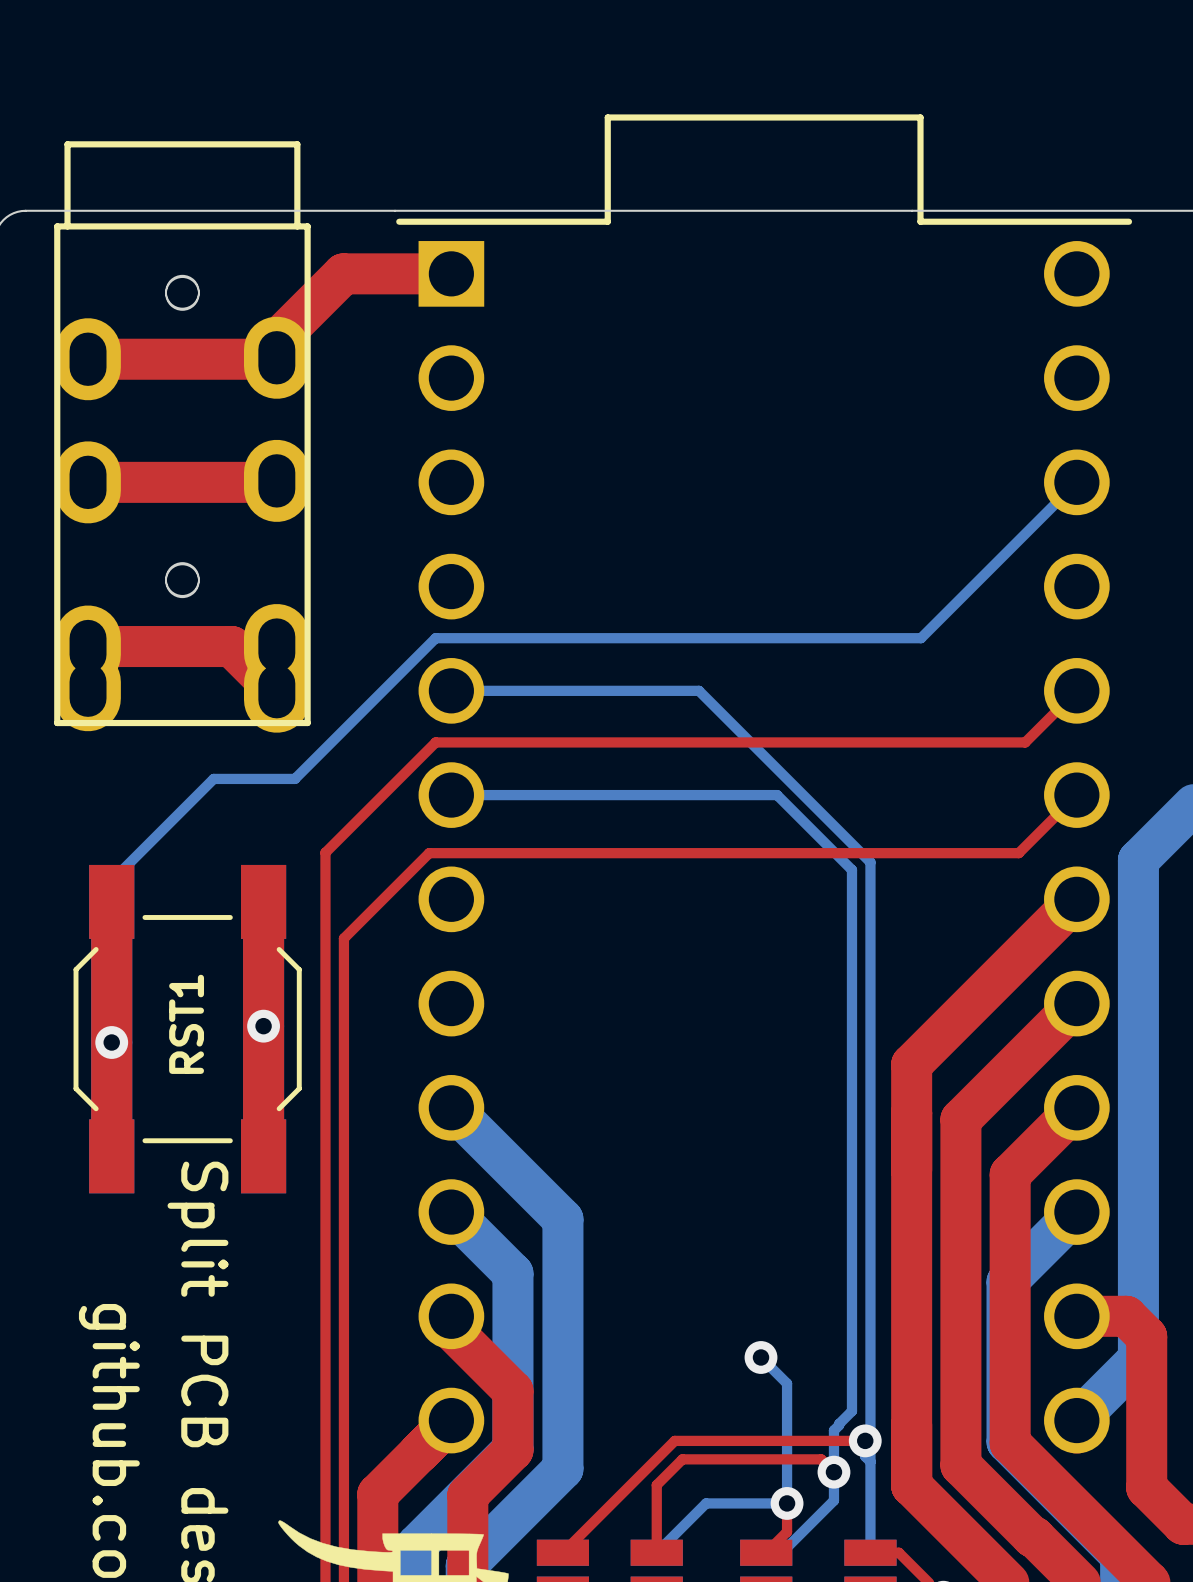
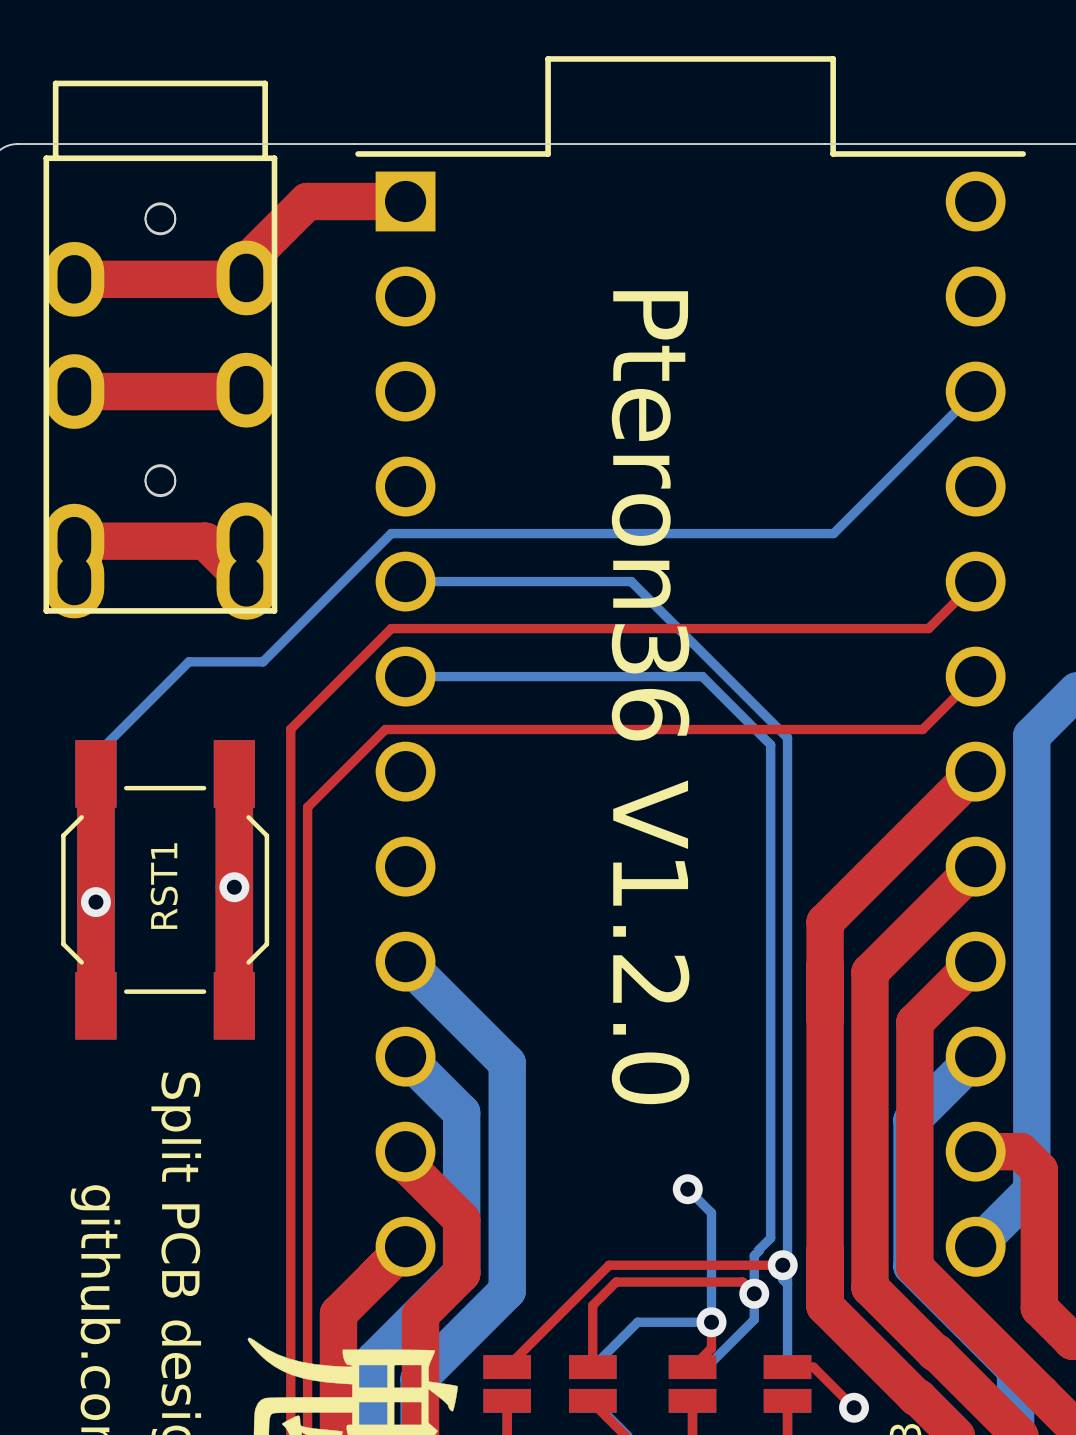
text: none -> Pteron36 V1.2.0 (650, 697)

